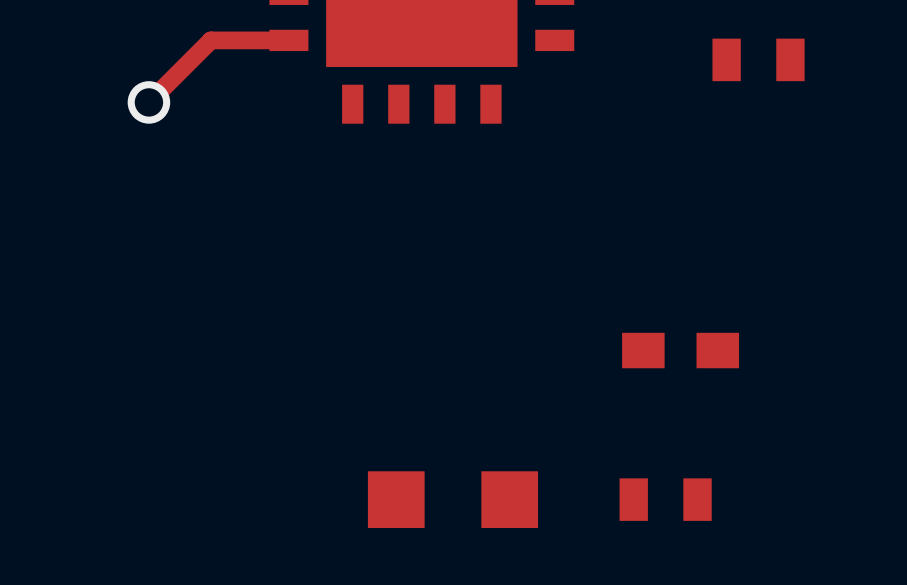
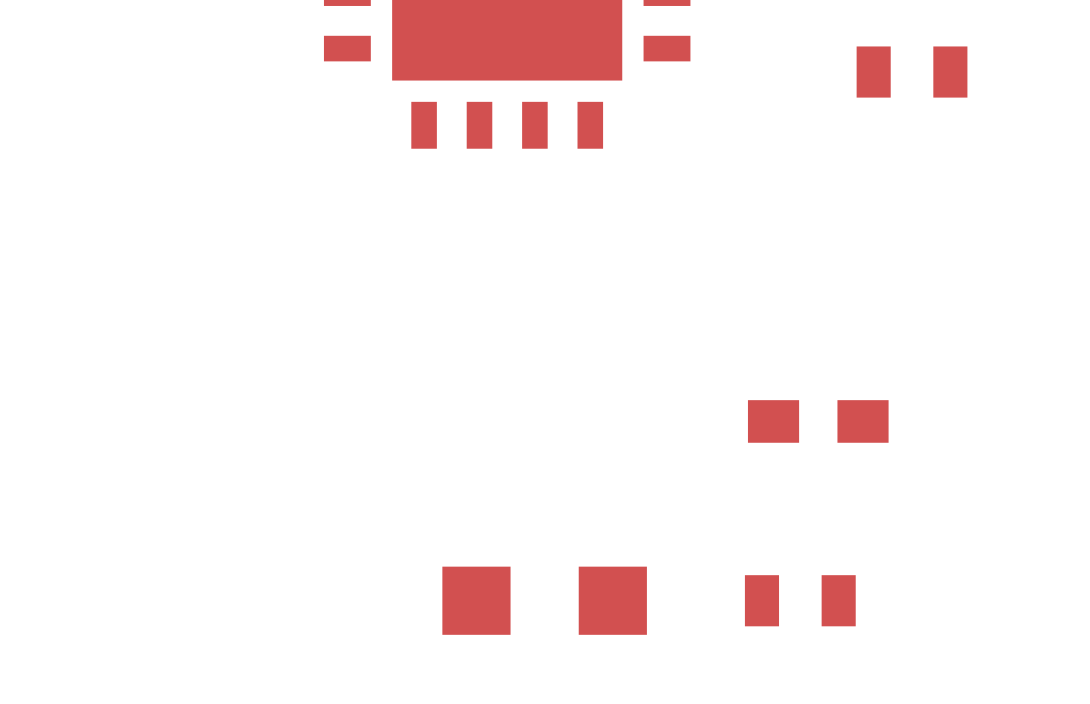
top track: (288, 40) (210, 40) (148, 102) -> none
via: (148, 102) -> none

